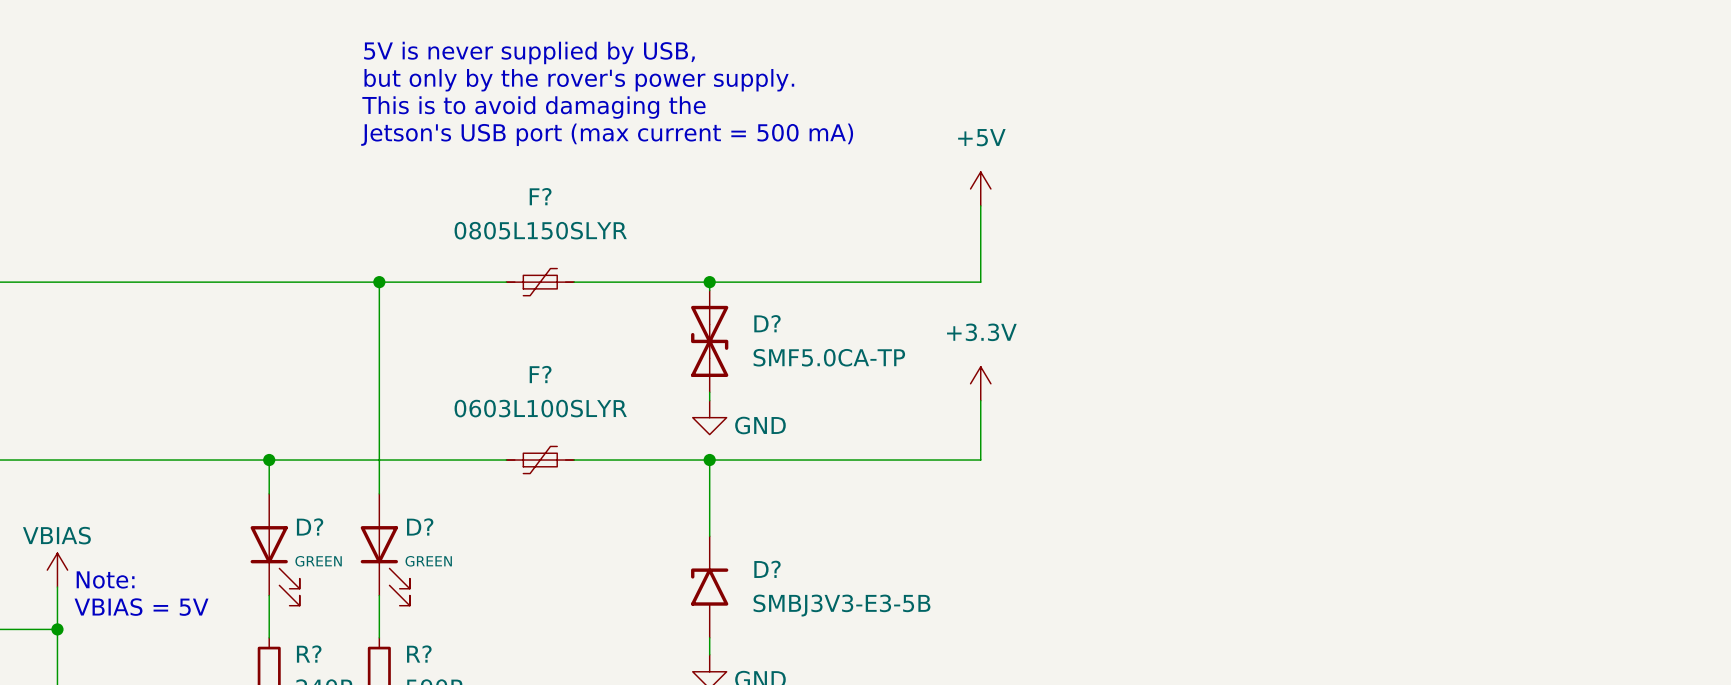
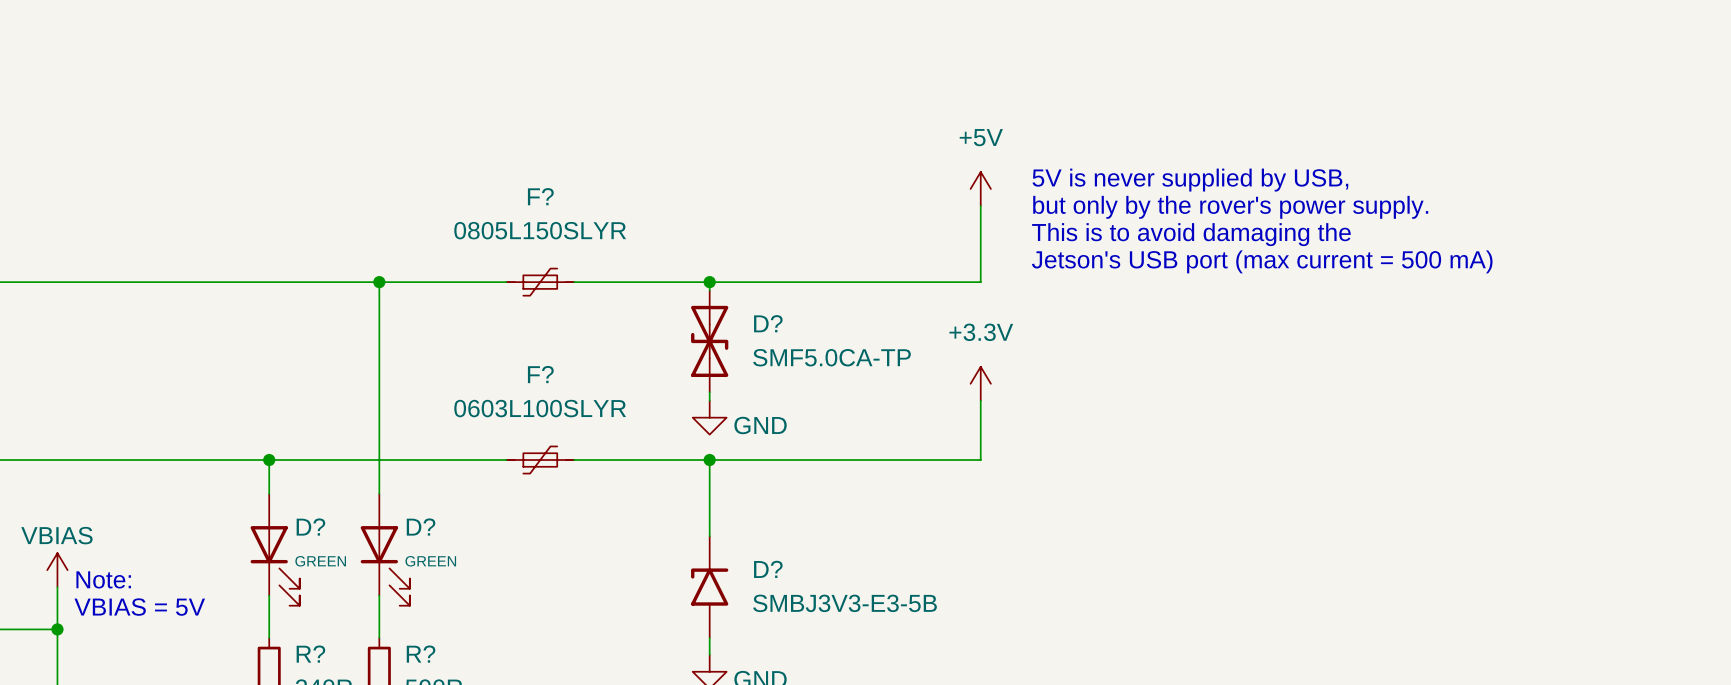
text: 5V is never supplied by USB, (529, 52) -> none
text: but only by the rover's power supply. (579, 80) -> none
text: This is to avoid damaging the (533, 107) -> none
text: Jetson's USB port (max current = 500 mA) (607, 134) -> none
text: none -> 5V is never supplied by USB, (1190, 180)
text: none -> but only by the rover's power supply. (1230, 207)
text: none -> This is to avoid damaging the (1191, 234)
text: none -> Jetson's USB port (max current = 500 mA) (1262, 261)

